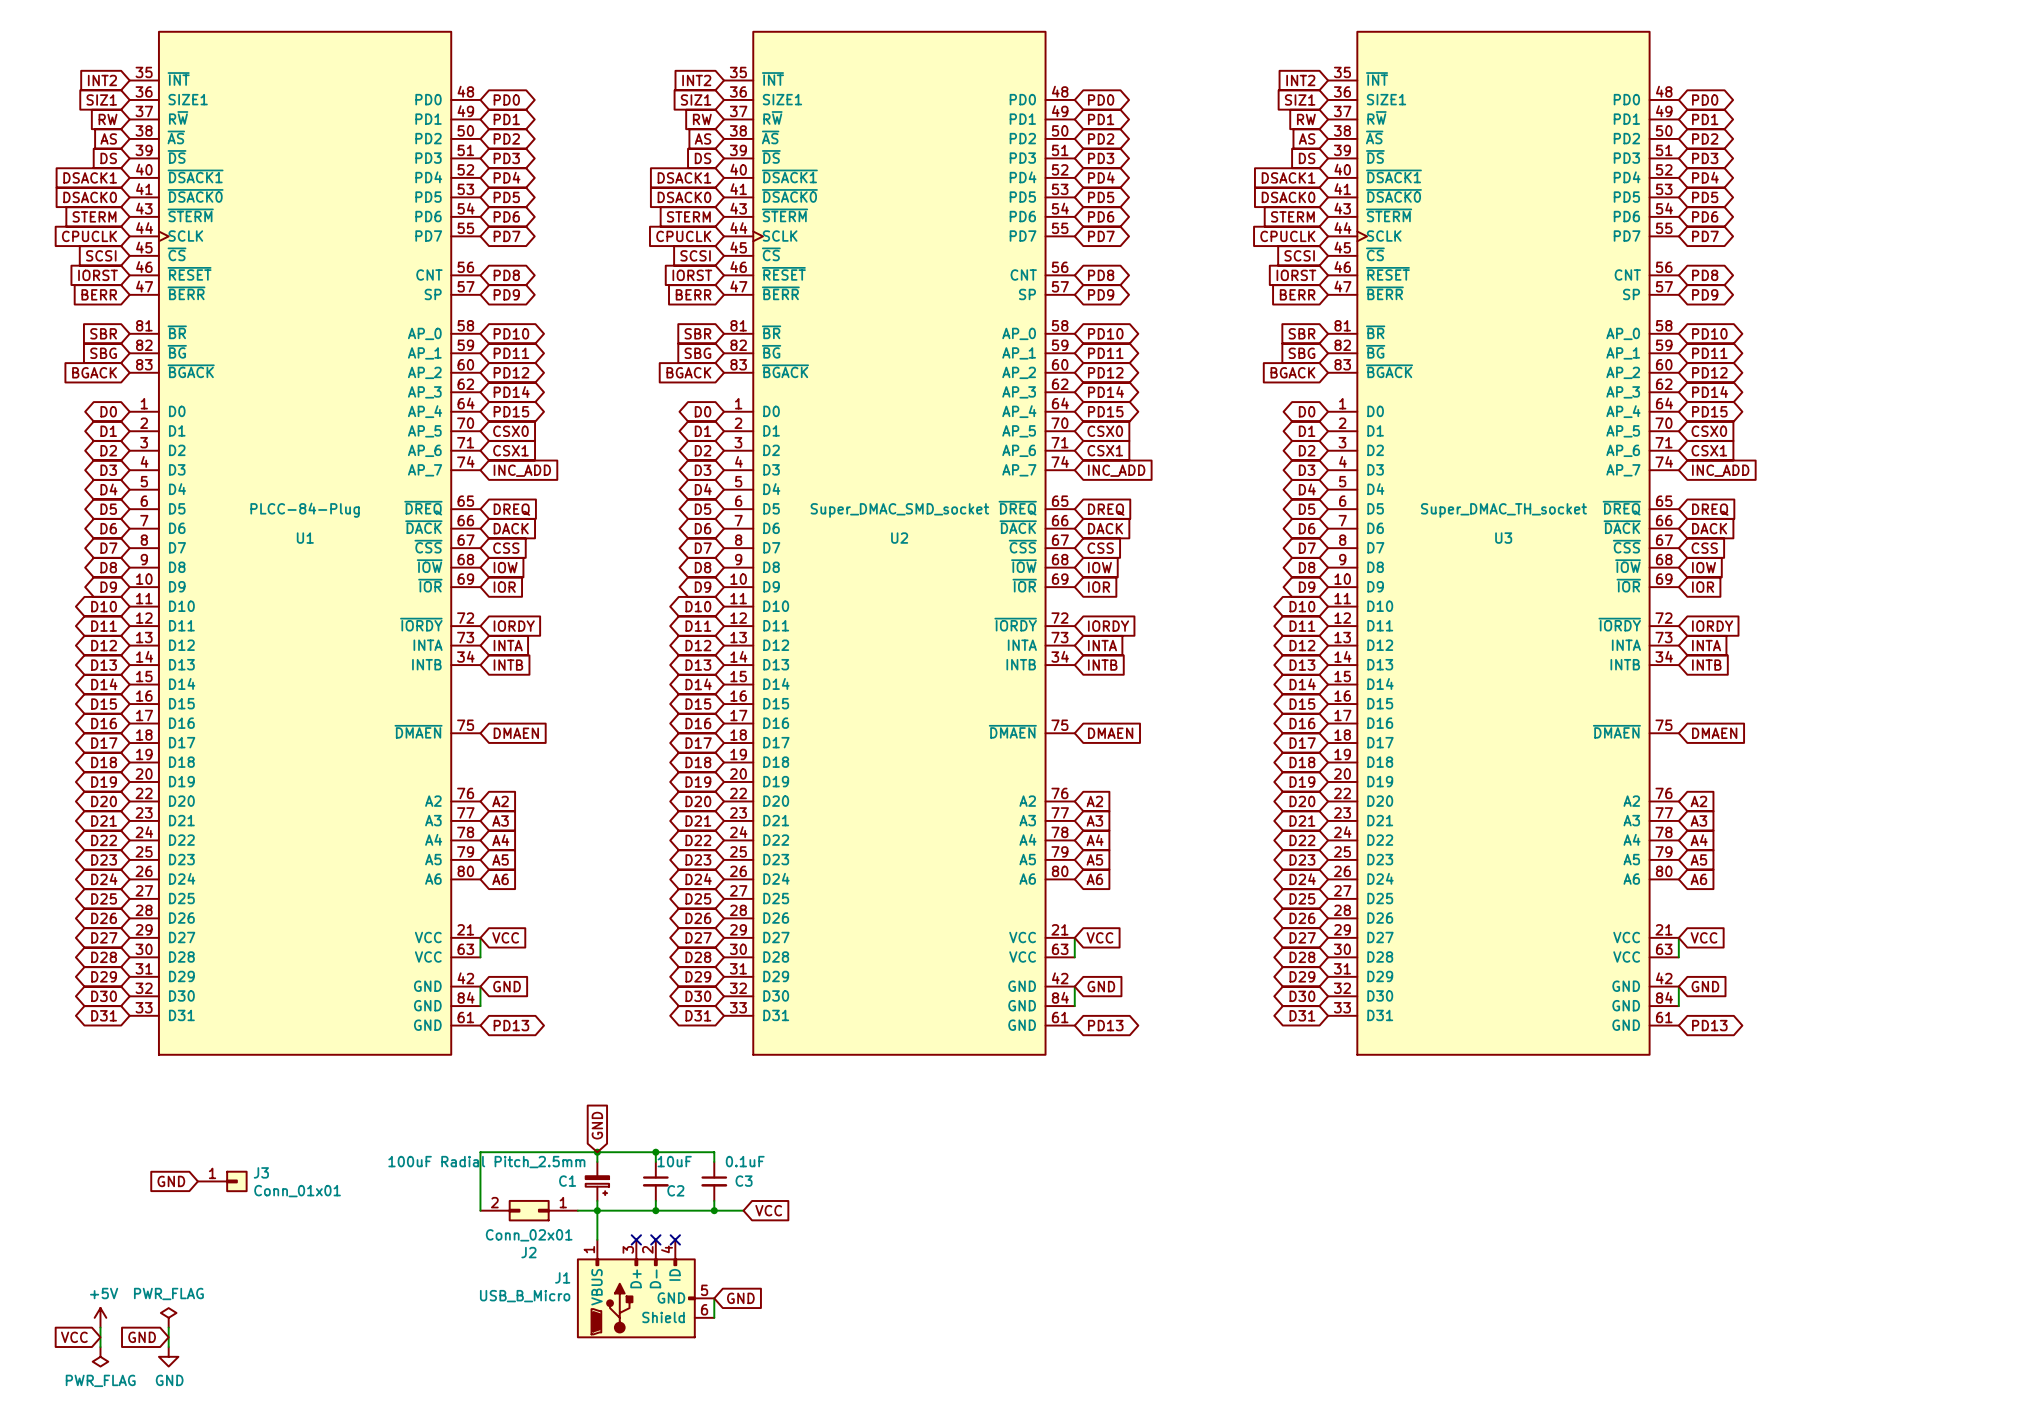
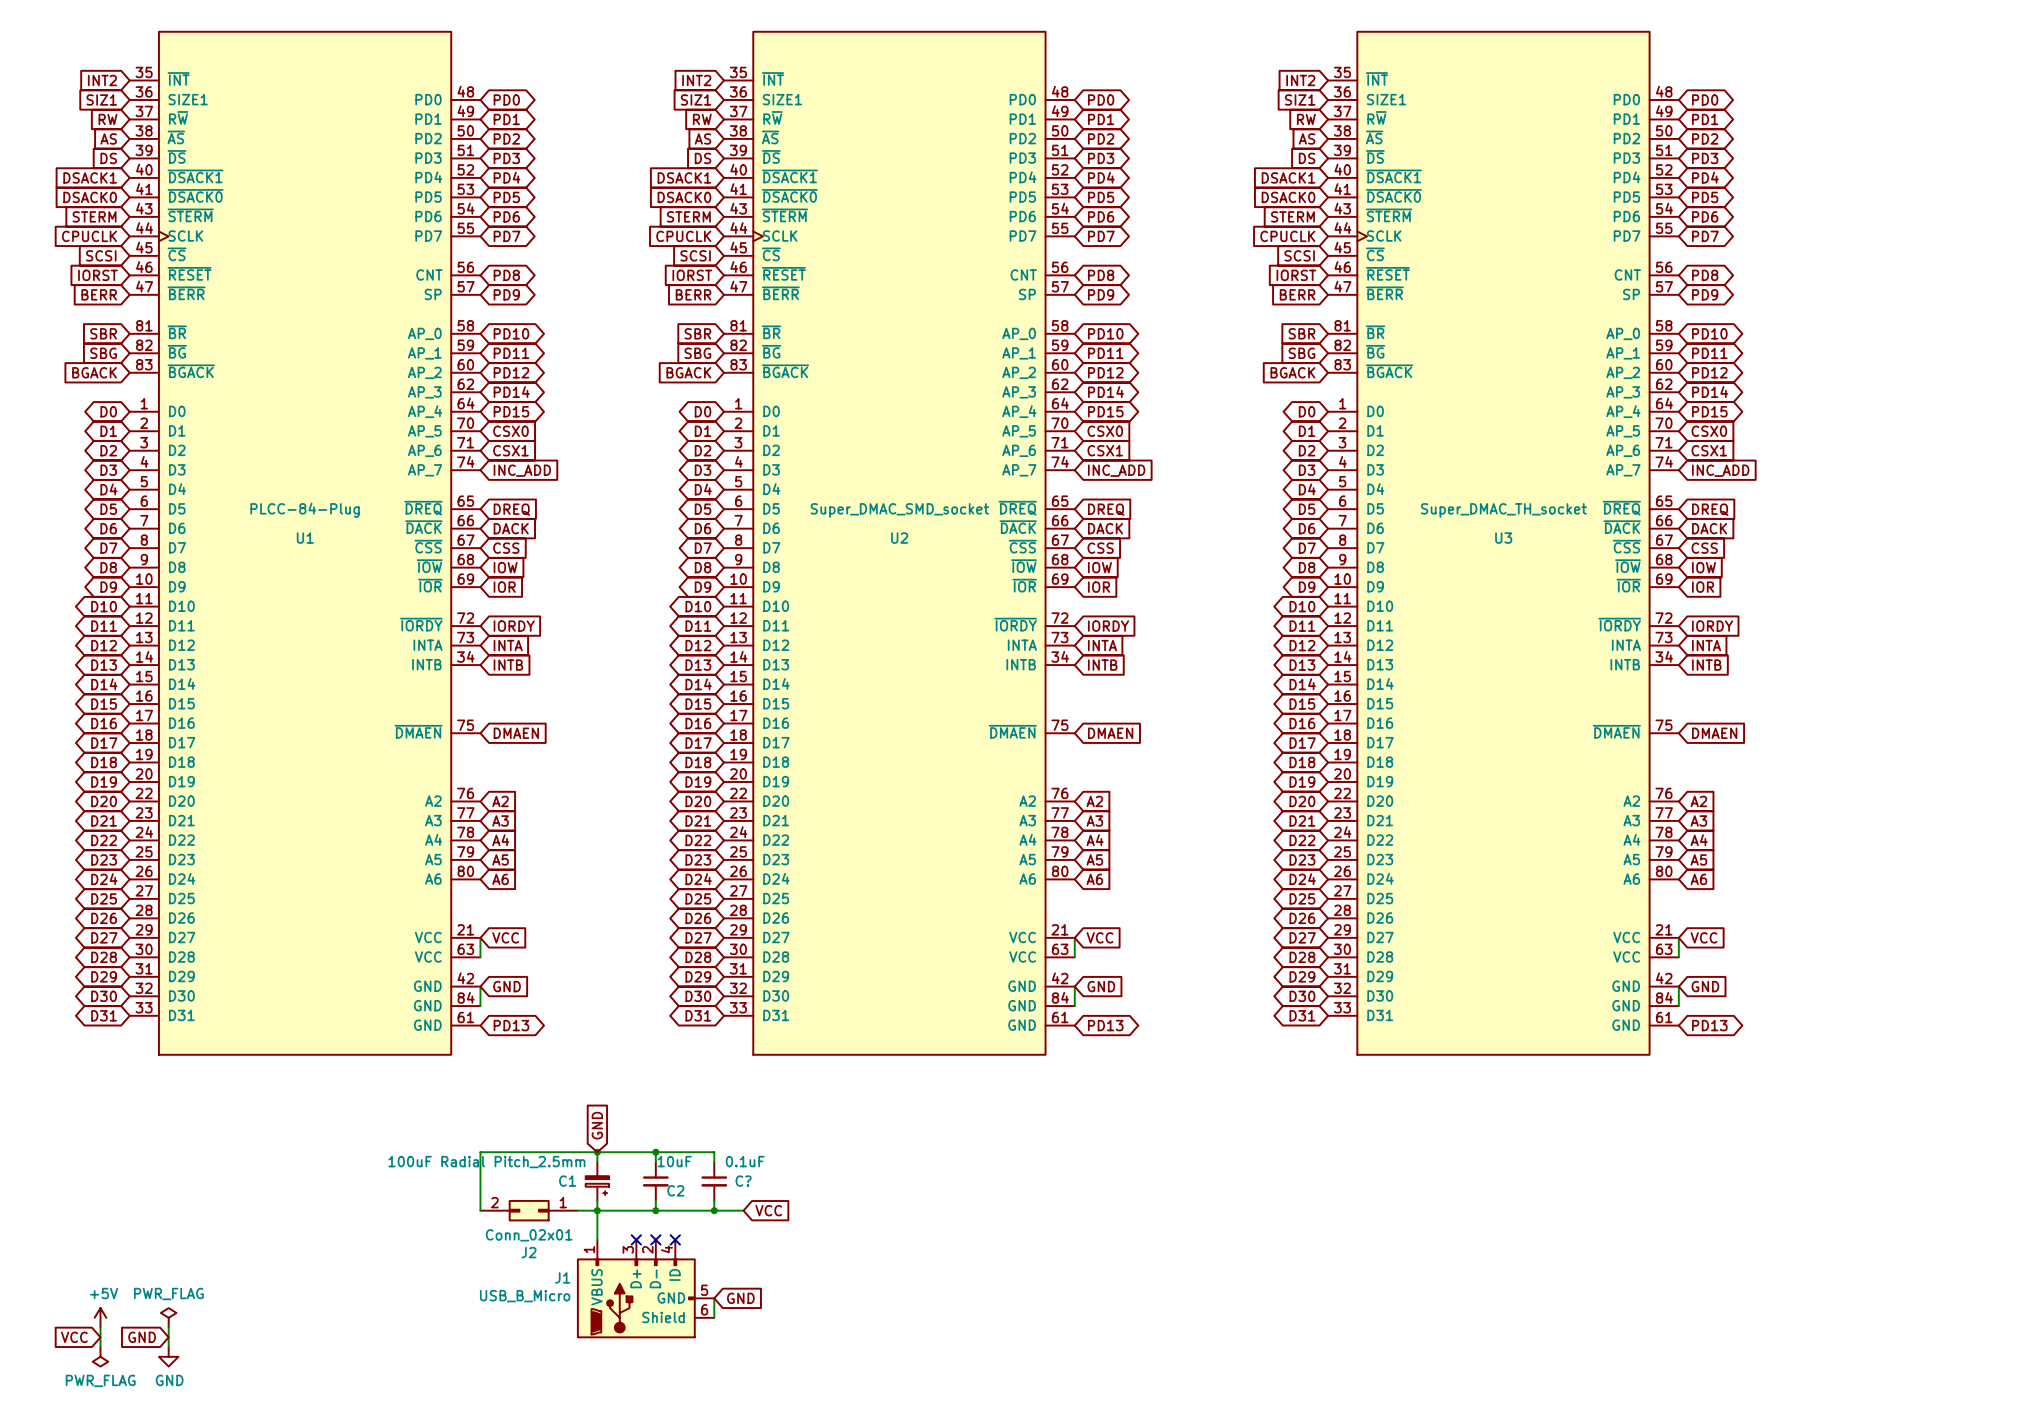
global label: GND (171, 1181) -> none
J3: Conn_01x01 (222, 1181) -> none
C3 name: C3 (744, 1181) -> C? (743, 1181)

